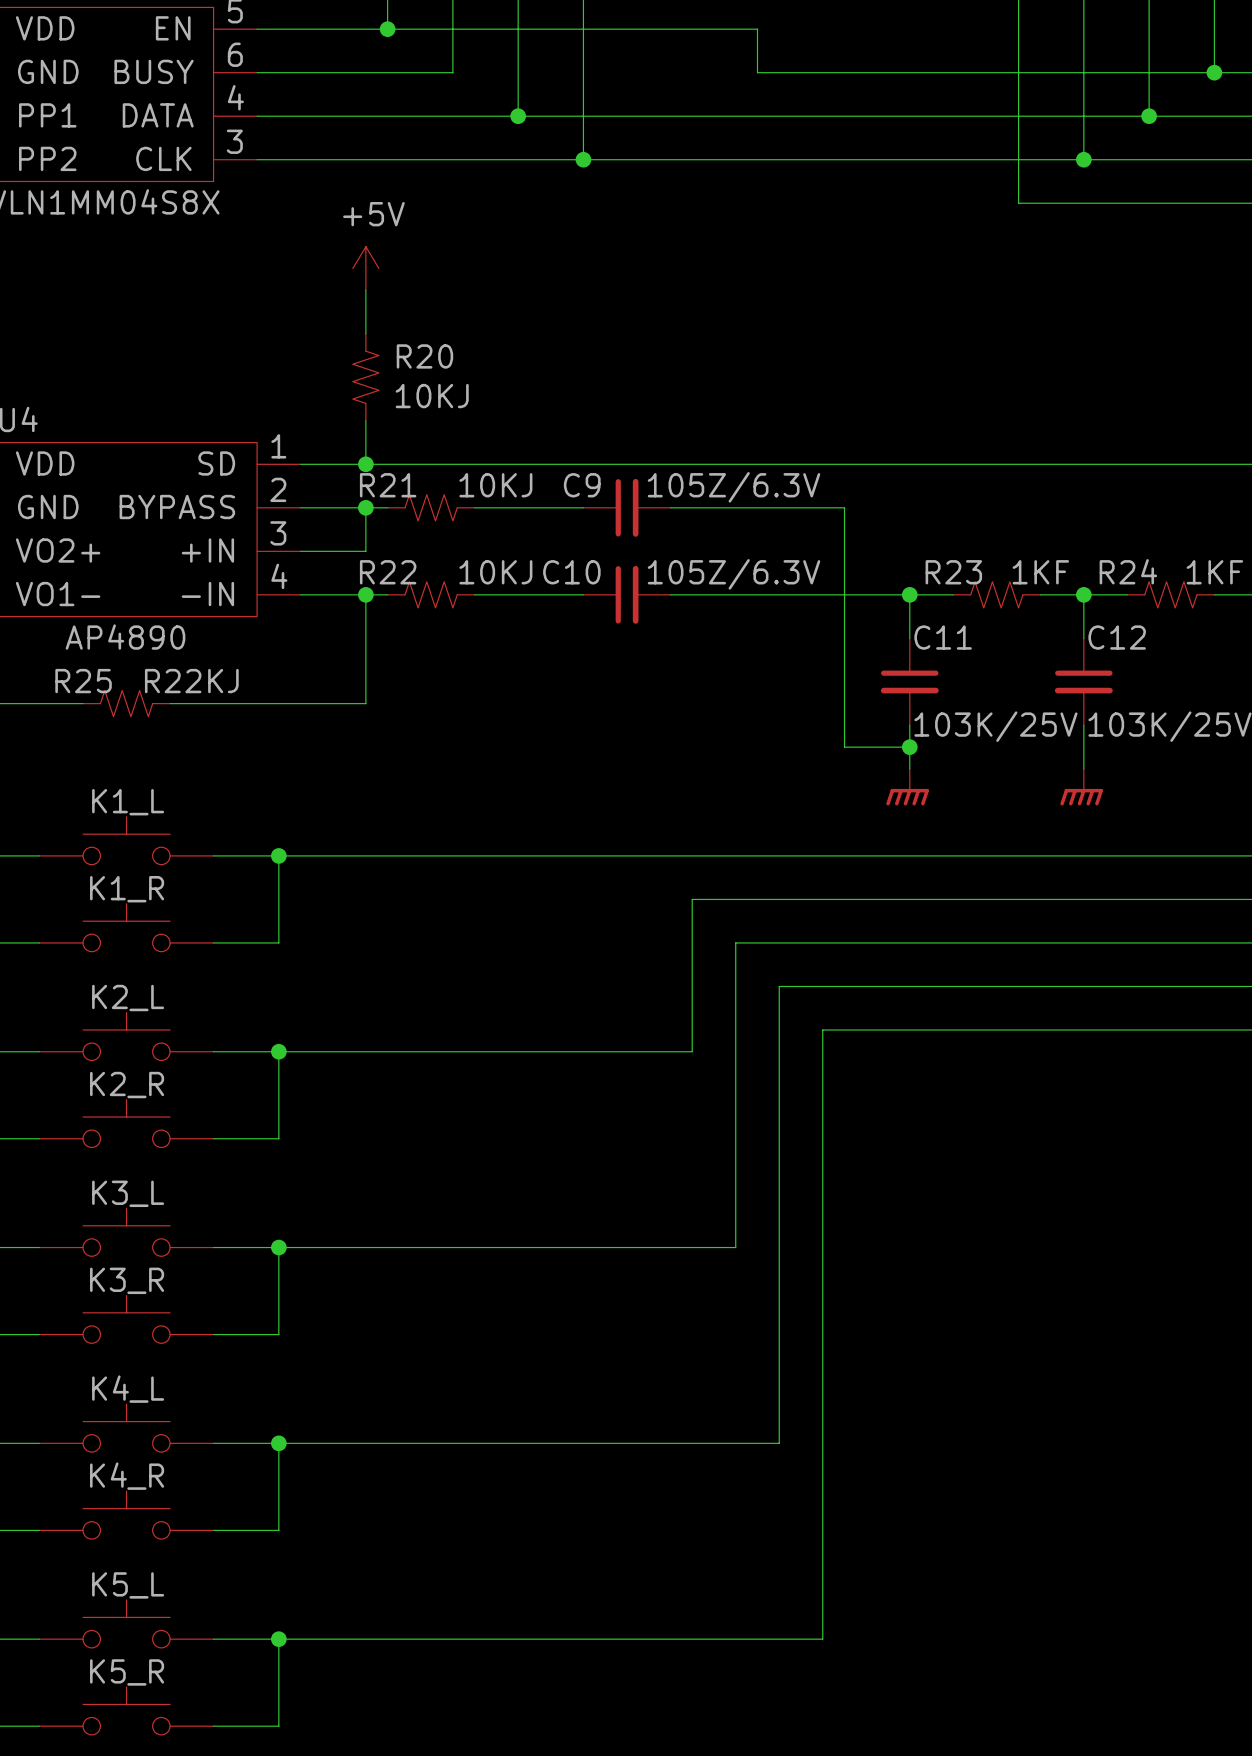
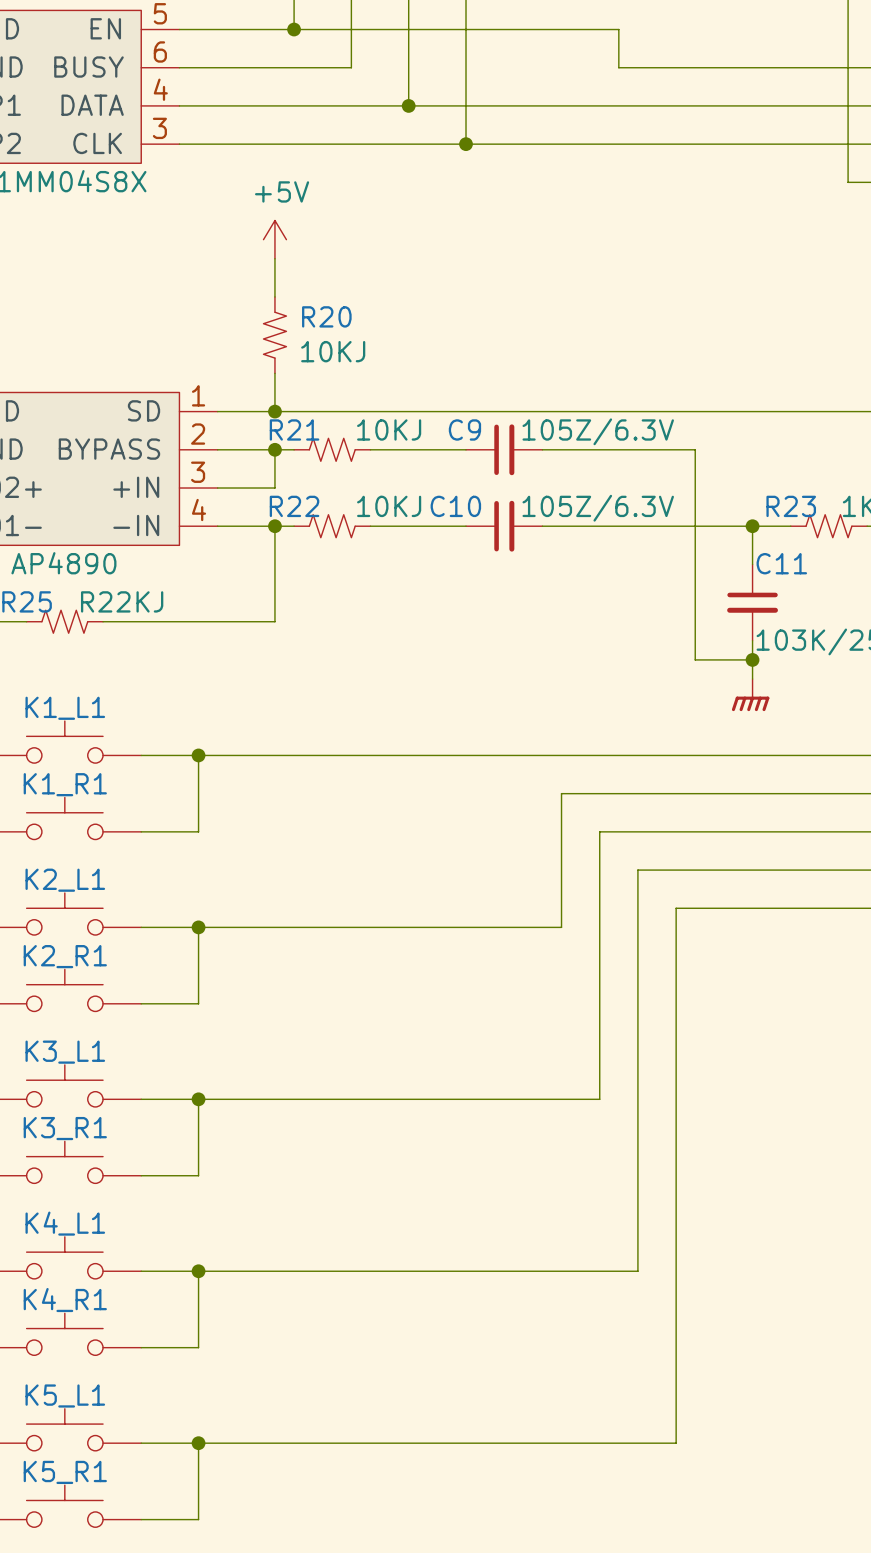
K1_L name: K1_L (128, 802) -> K1_L1 (65, 708)
K1_R name: K1_R (127, 889) -> K1_R1 (65, 784)
K2_L name: K2_L (128, 998) -> K2_L1 (65, 880)
K2_R name: K2_R (127, 1085) -> K2_R1 (65, 956)
K3_L name: K3_L (128, 1193) -> K3_L1 (65, 1052)
K3_R name: K3_R (127, 1280) -> K3_R1 (65, 1128)
K4_L name: K4_L (128, 1389) -> K4_L1 (65, 1223)
K4_R name: K4_R (127, 1476) -> K4_R1 (65, 1300)
K5_L name: K5_L (128, 1585) -> K5_L1 (65, 1395)
K5_R name: K5_R (127, 1672) -> K5_R1 (65, 1472)

